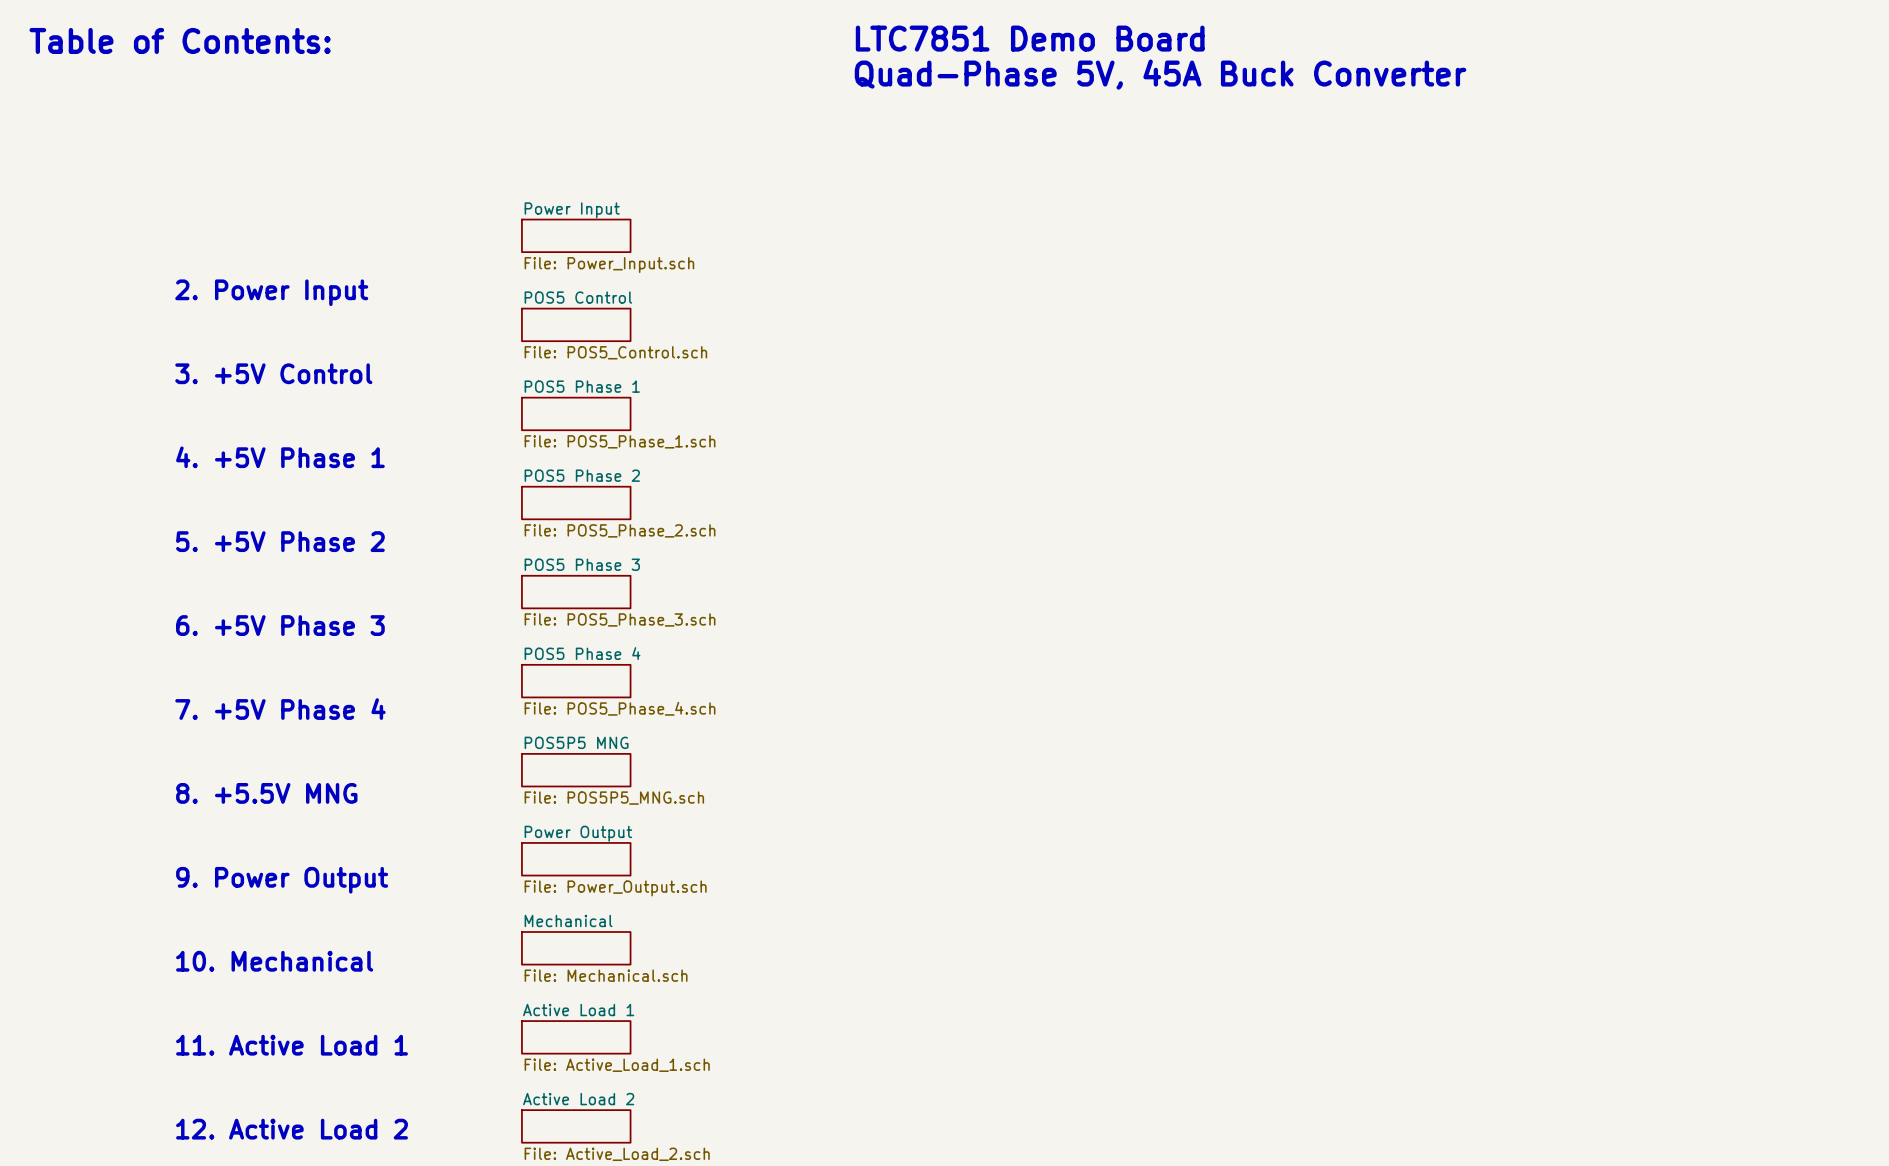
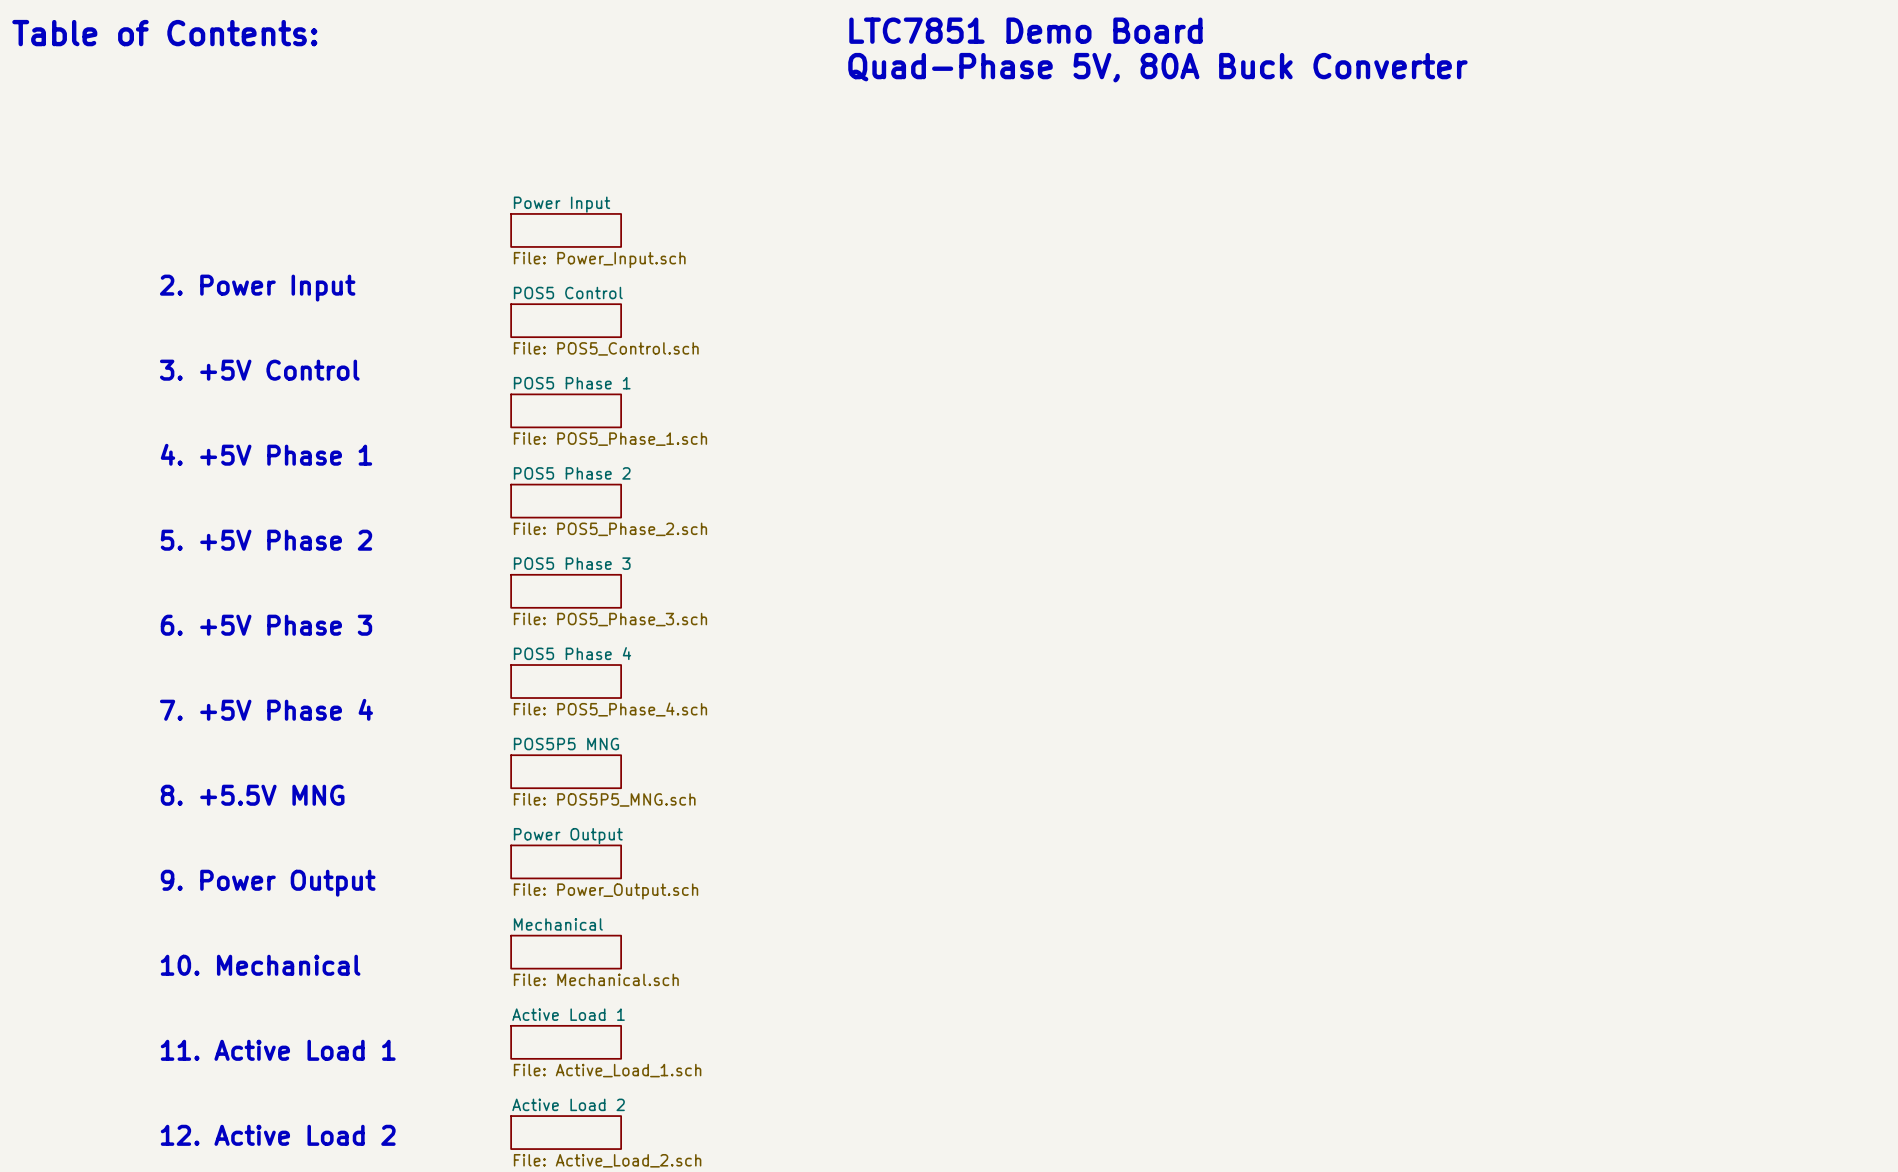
text: Quad-Phase 5V, 45A Buck Converter (1160, 74) -> Quad-Phase 5V, 80A Buck Converter (1157, 67)

